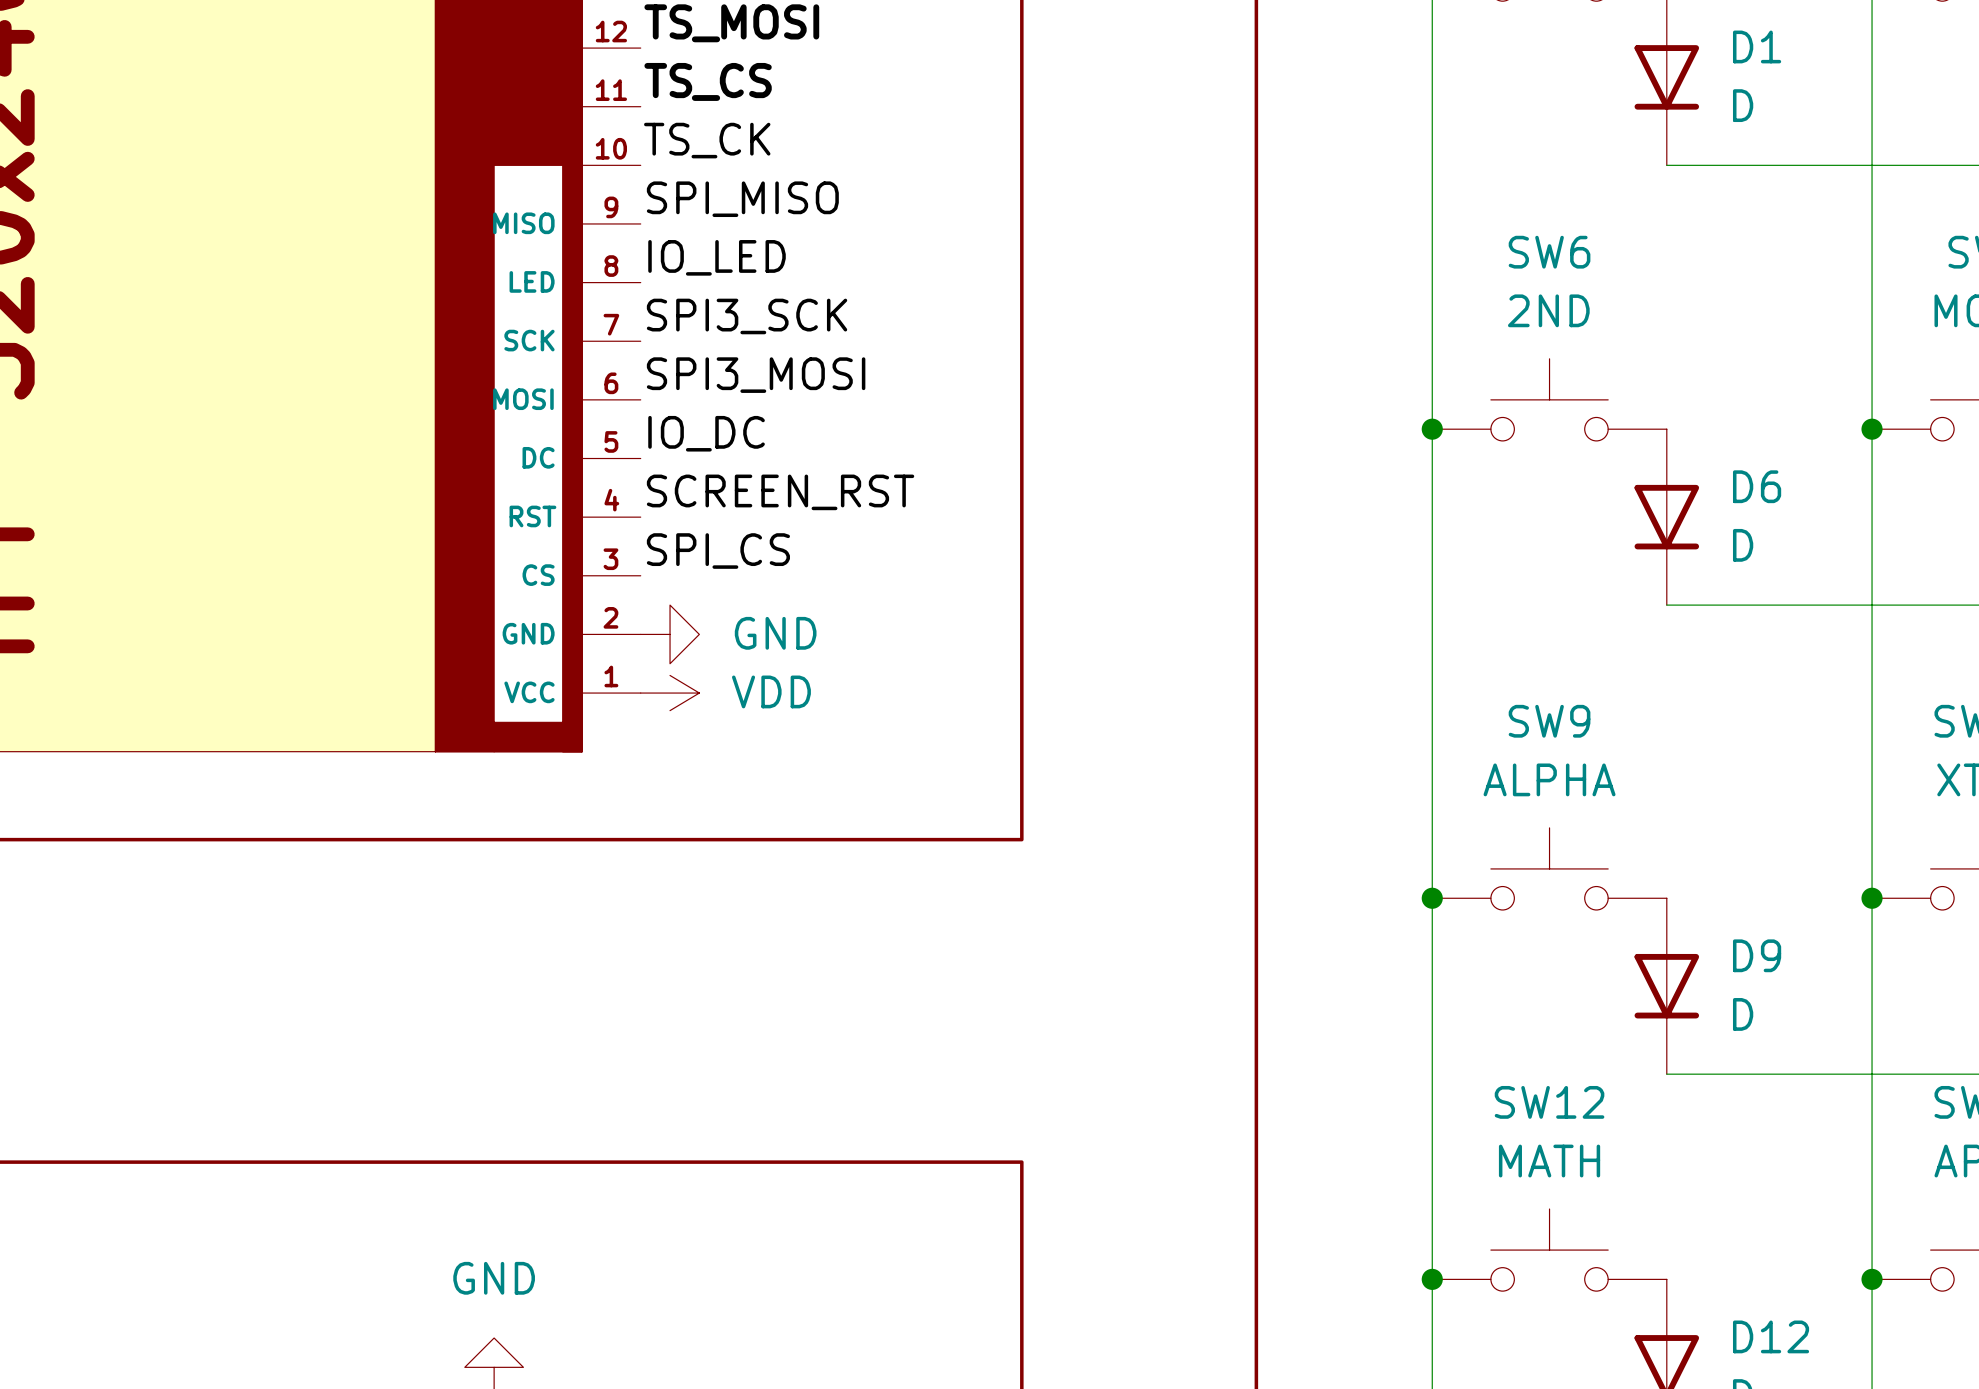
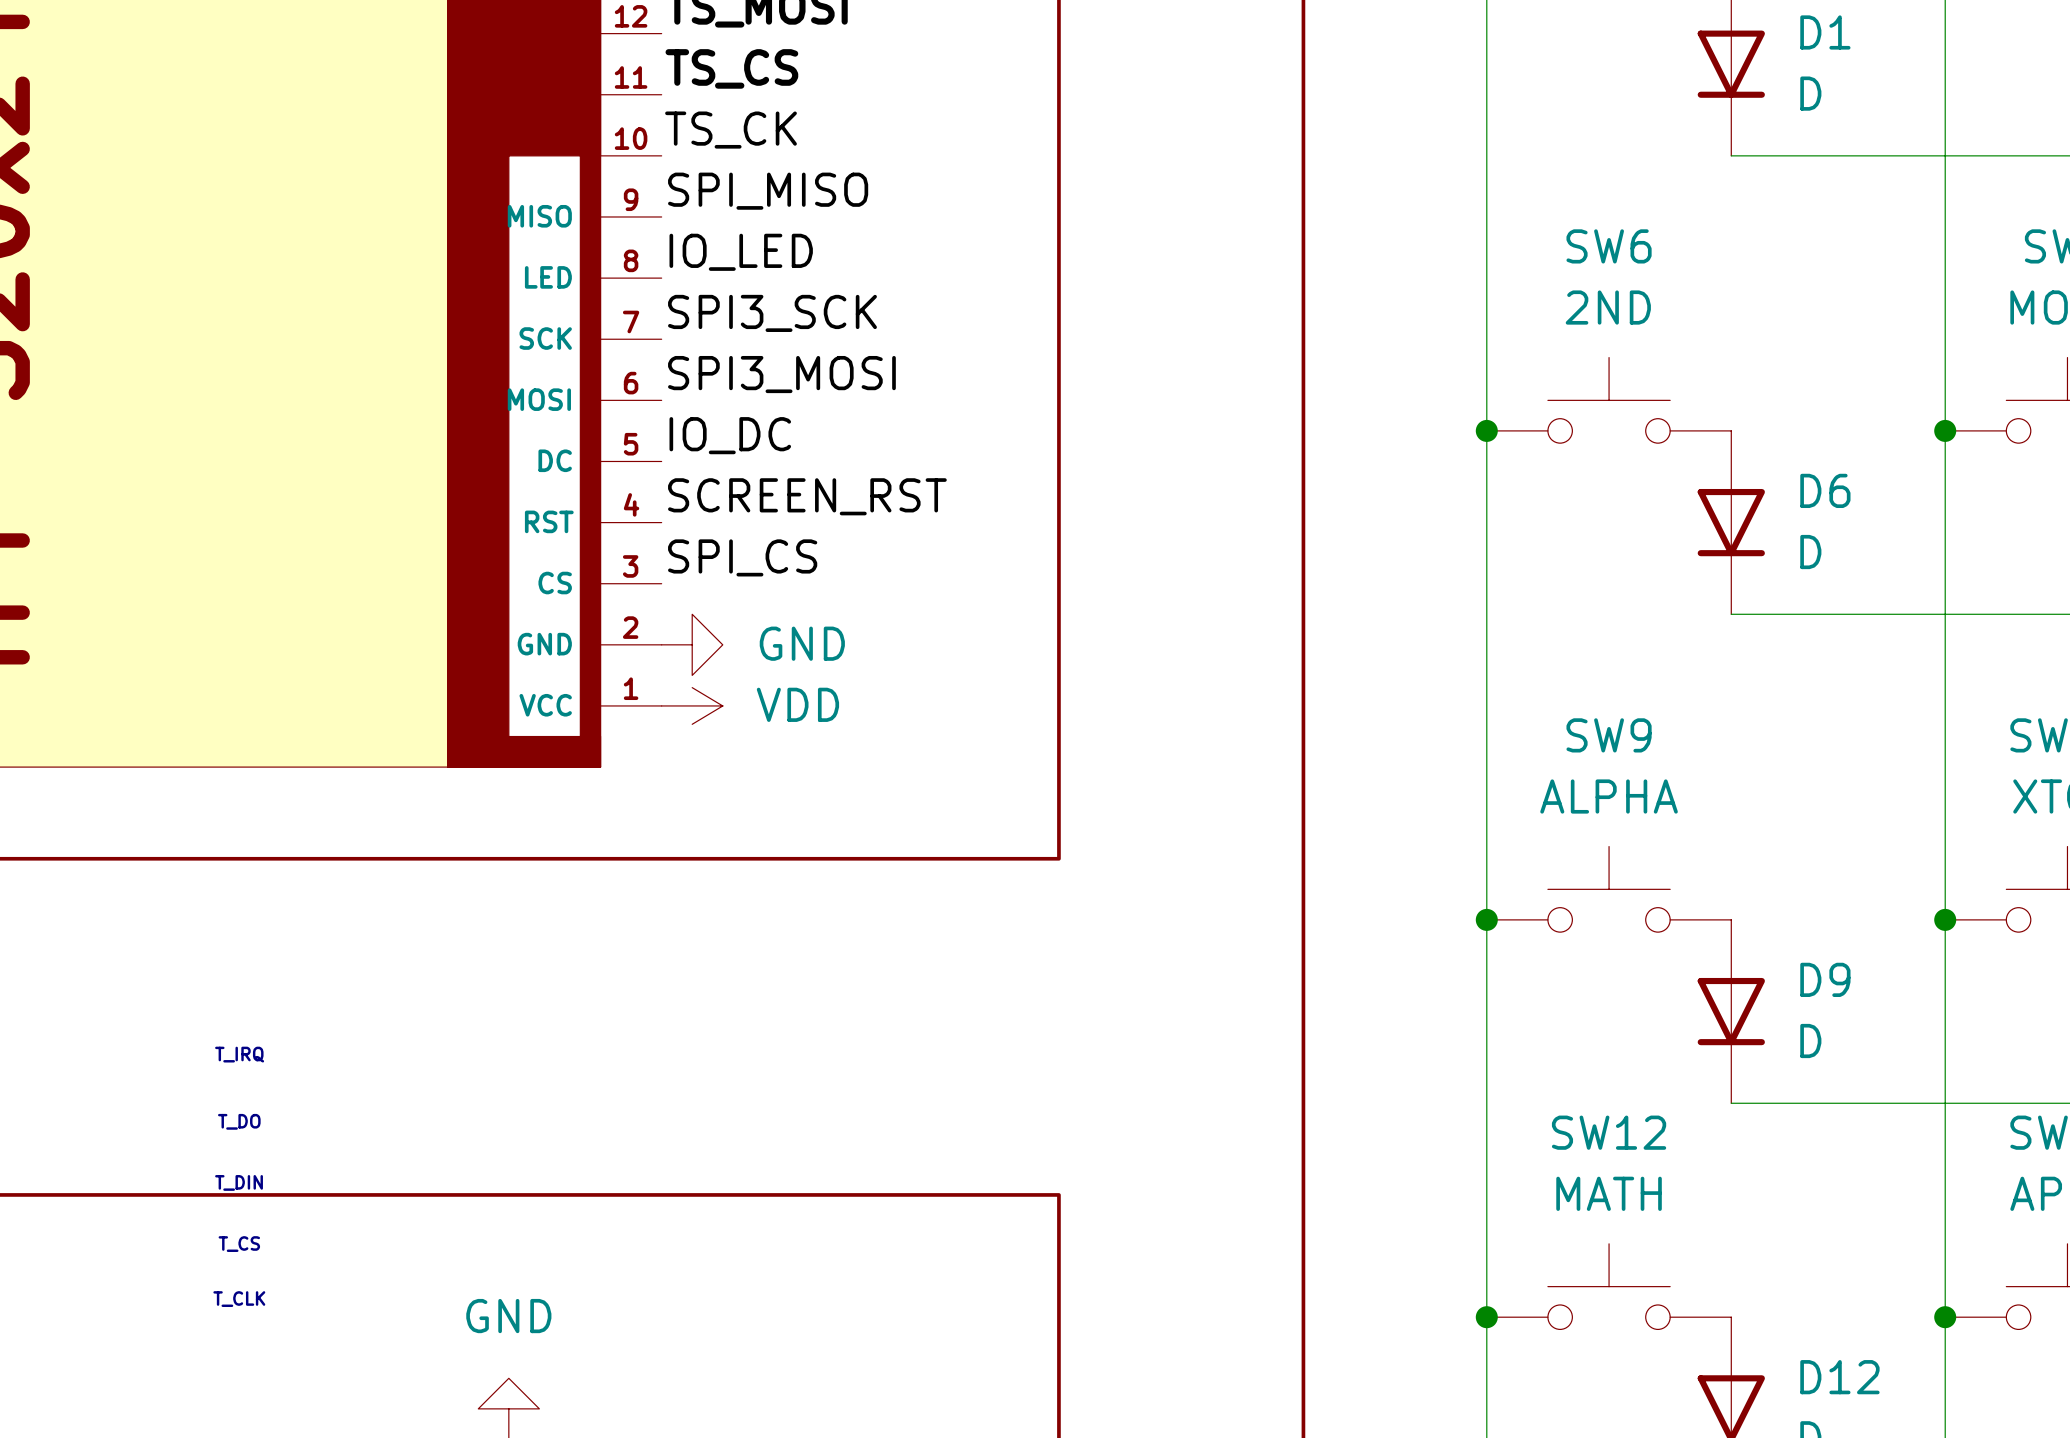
text: none -> T_IRQ (239, 1054)
text: none -> T_DO (239, 1121)
text: none -> T_DIN (239, 1182)
text: none -> T_CS (239, 1244)
text: none -> T_CLK (239, 1299)

